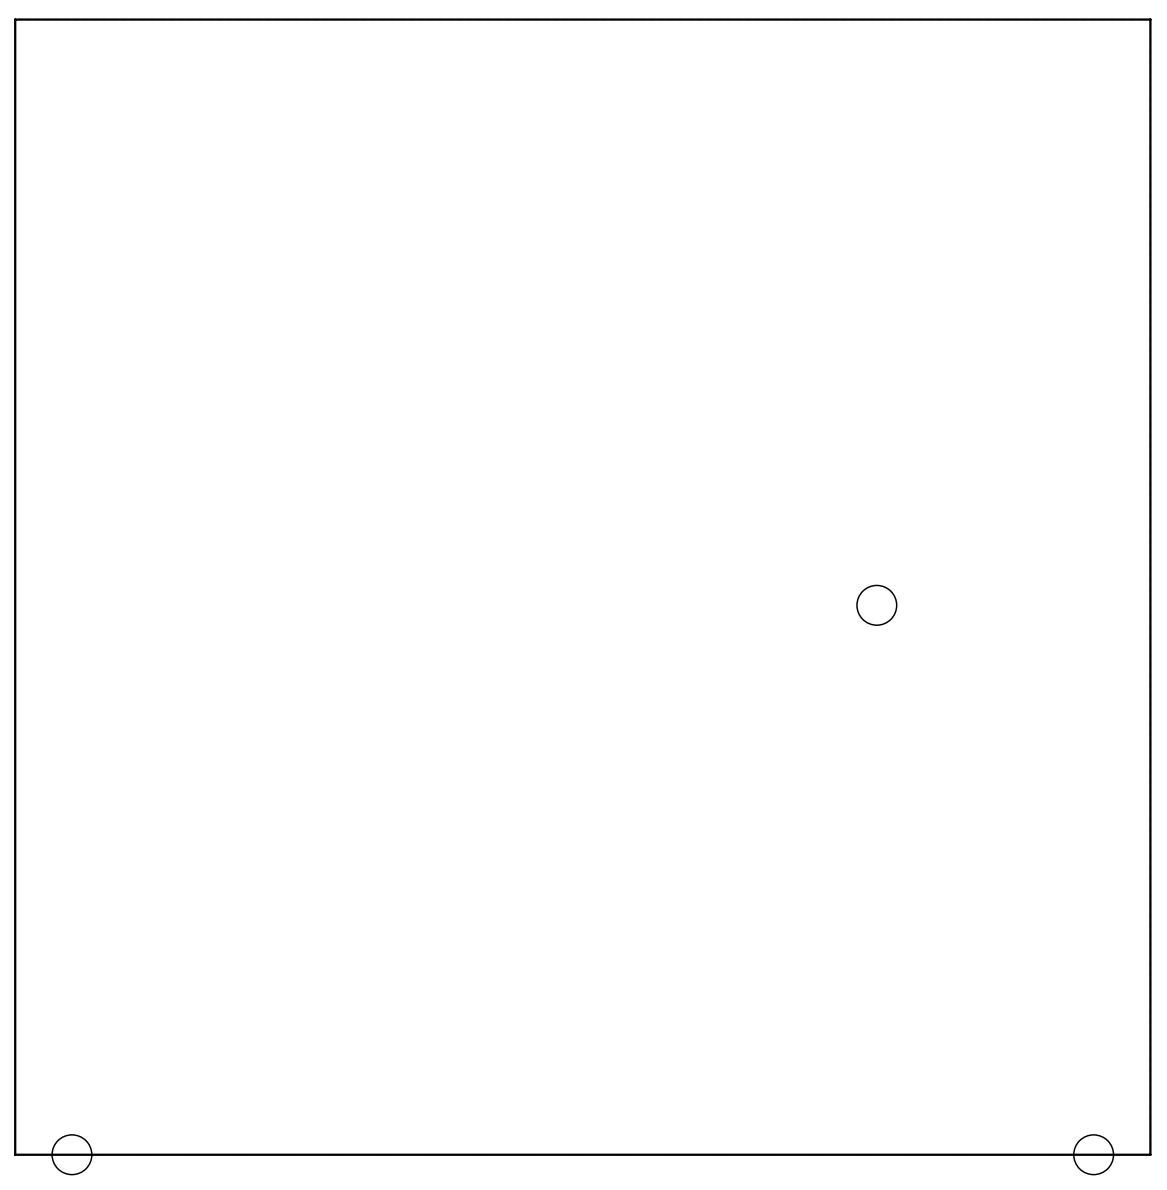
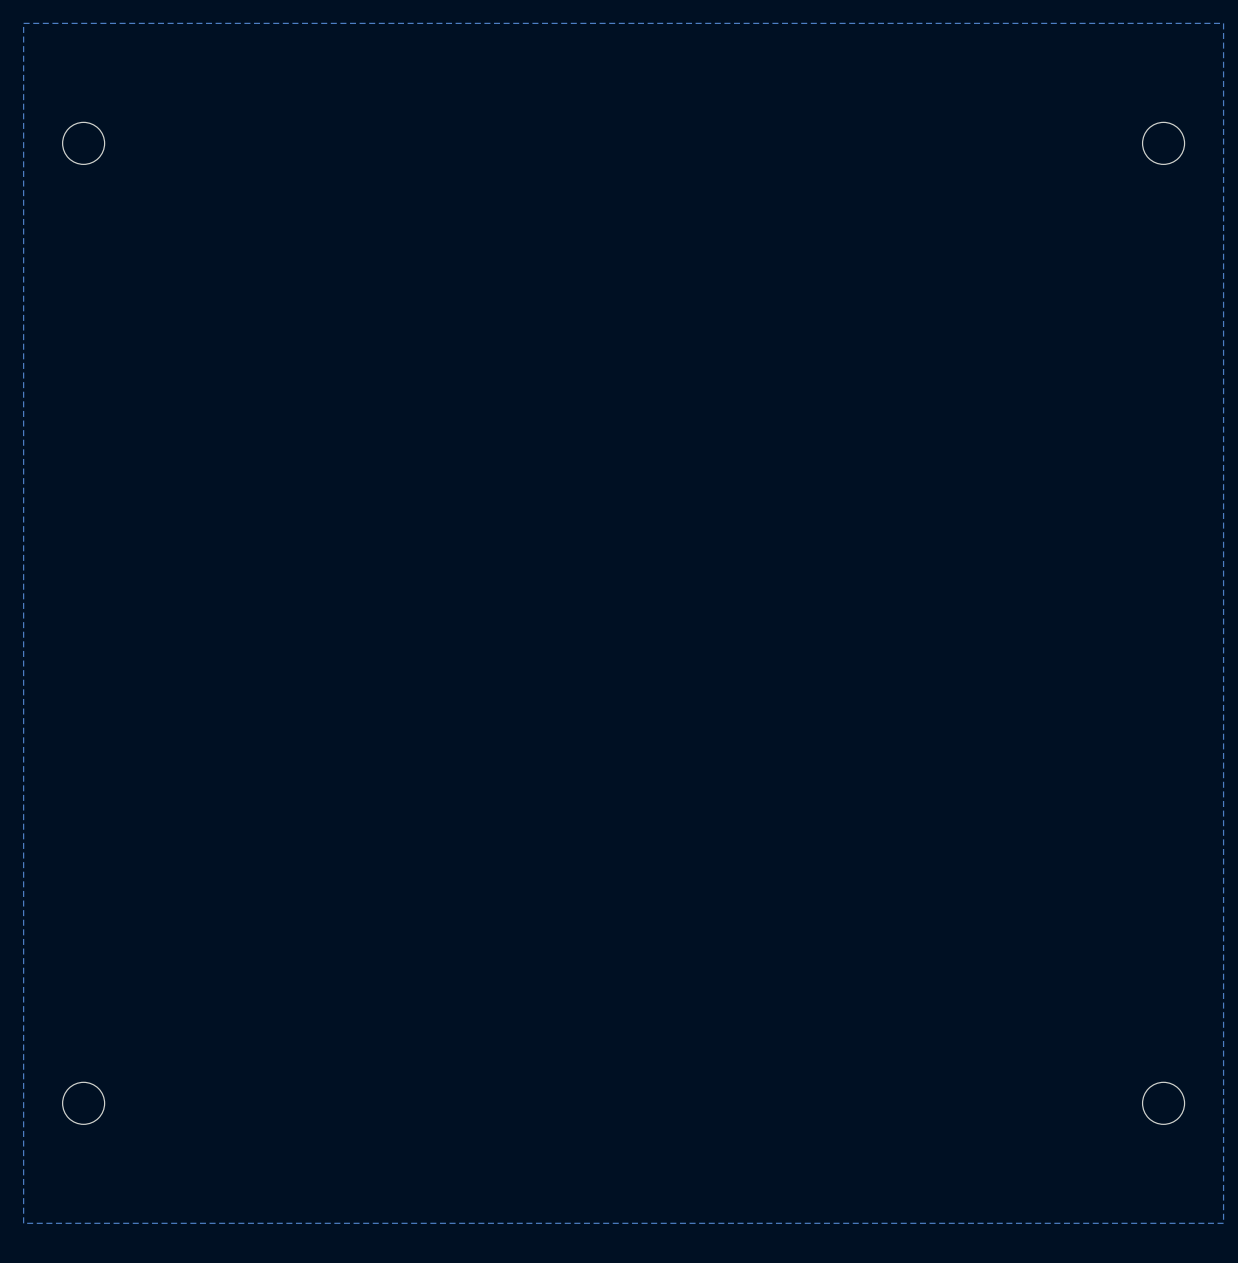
board edge: (1150, 19) (15, 19) (15, 1154) (1150, 1154) (1150, 19) -> none
round board edge: none -> [62, 122, 105, 165]
round board edge: none -> [1142, 122, 1185, 165]
round board edge: [856, 585, 897, 626] -> none
round board edge position: (71, 1154) -> (83, 1103)
round board edge position: (1093, 1154) -> (1163, 1103)

